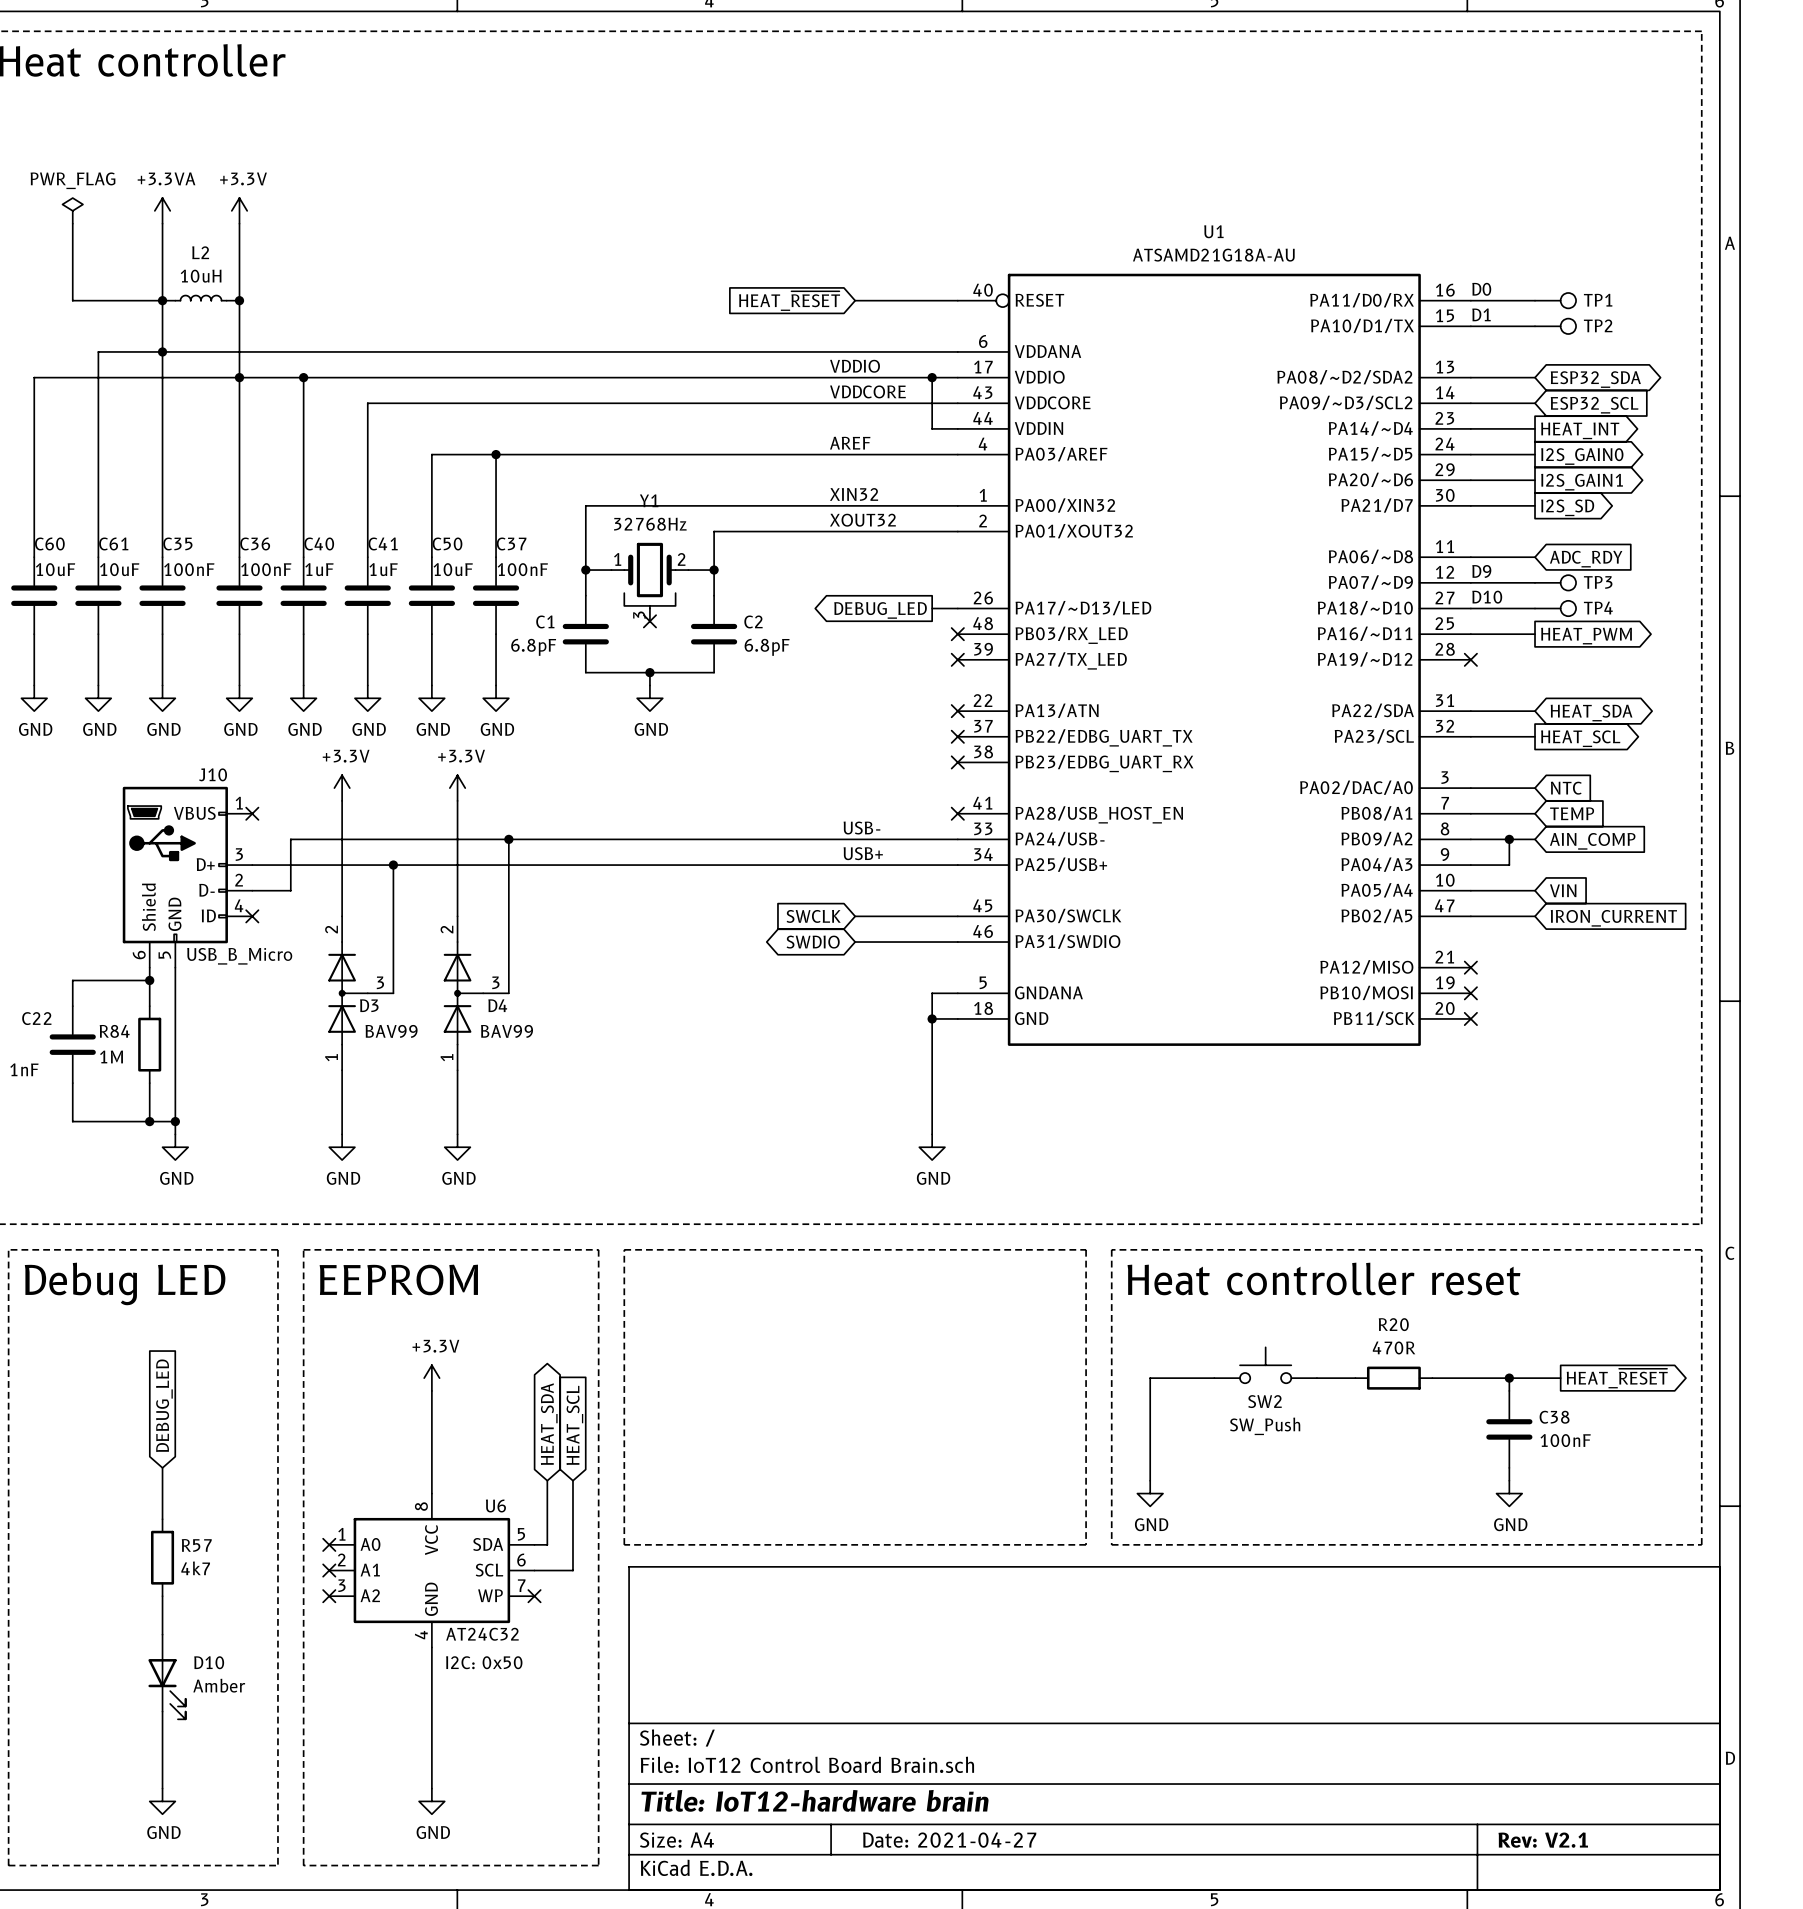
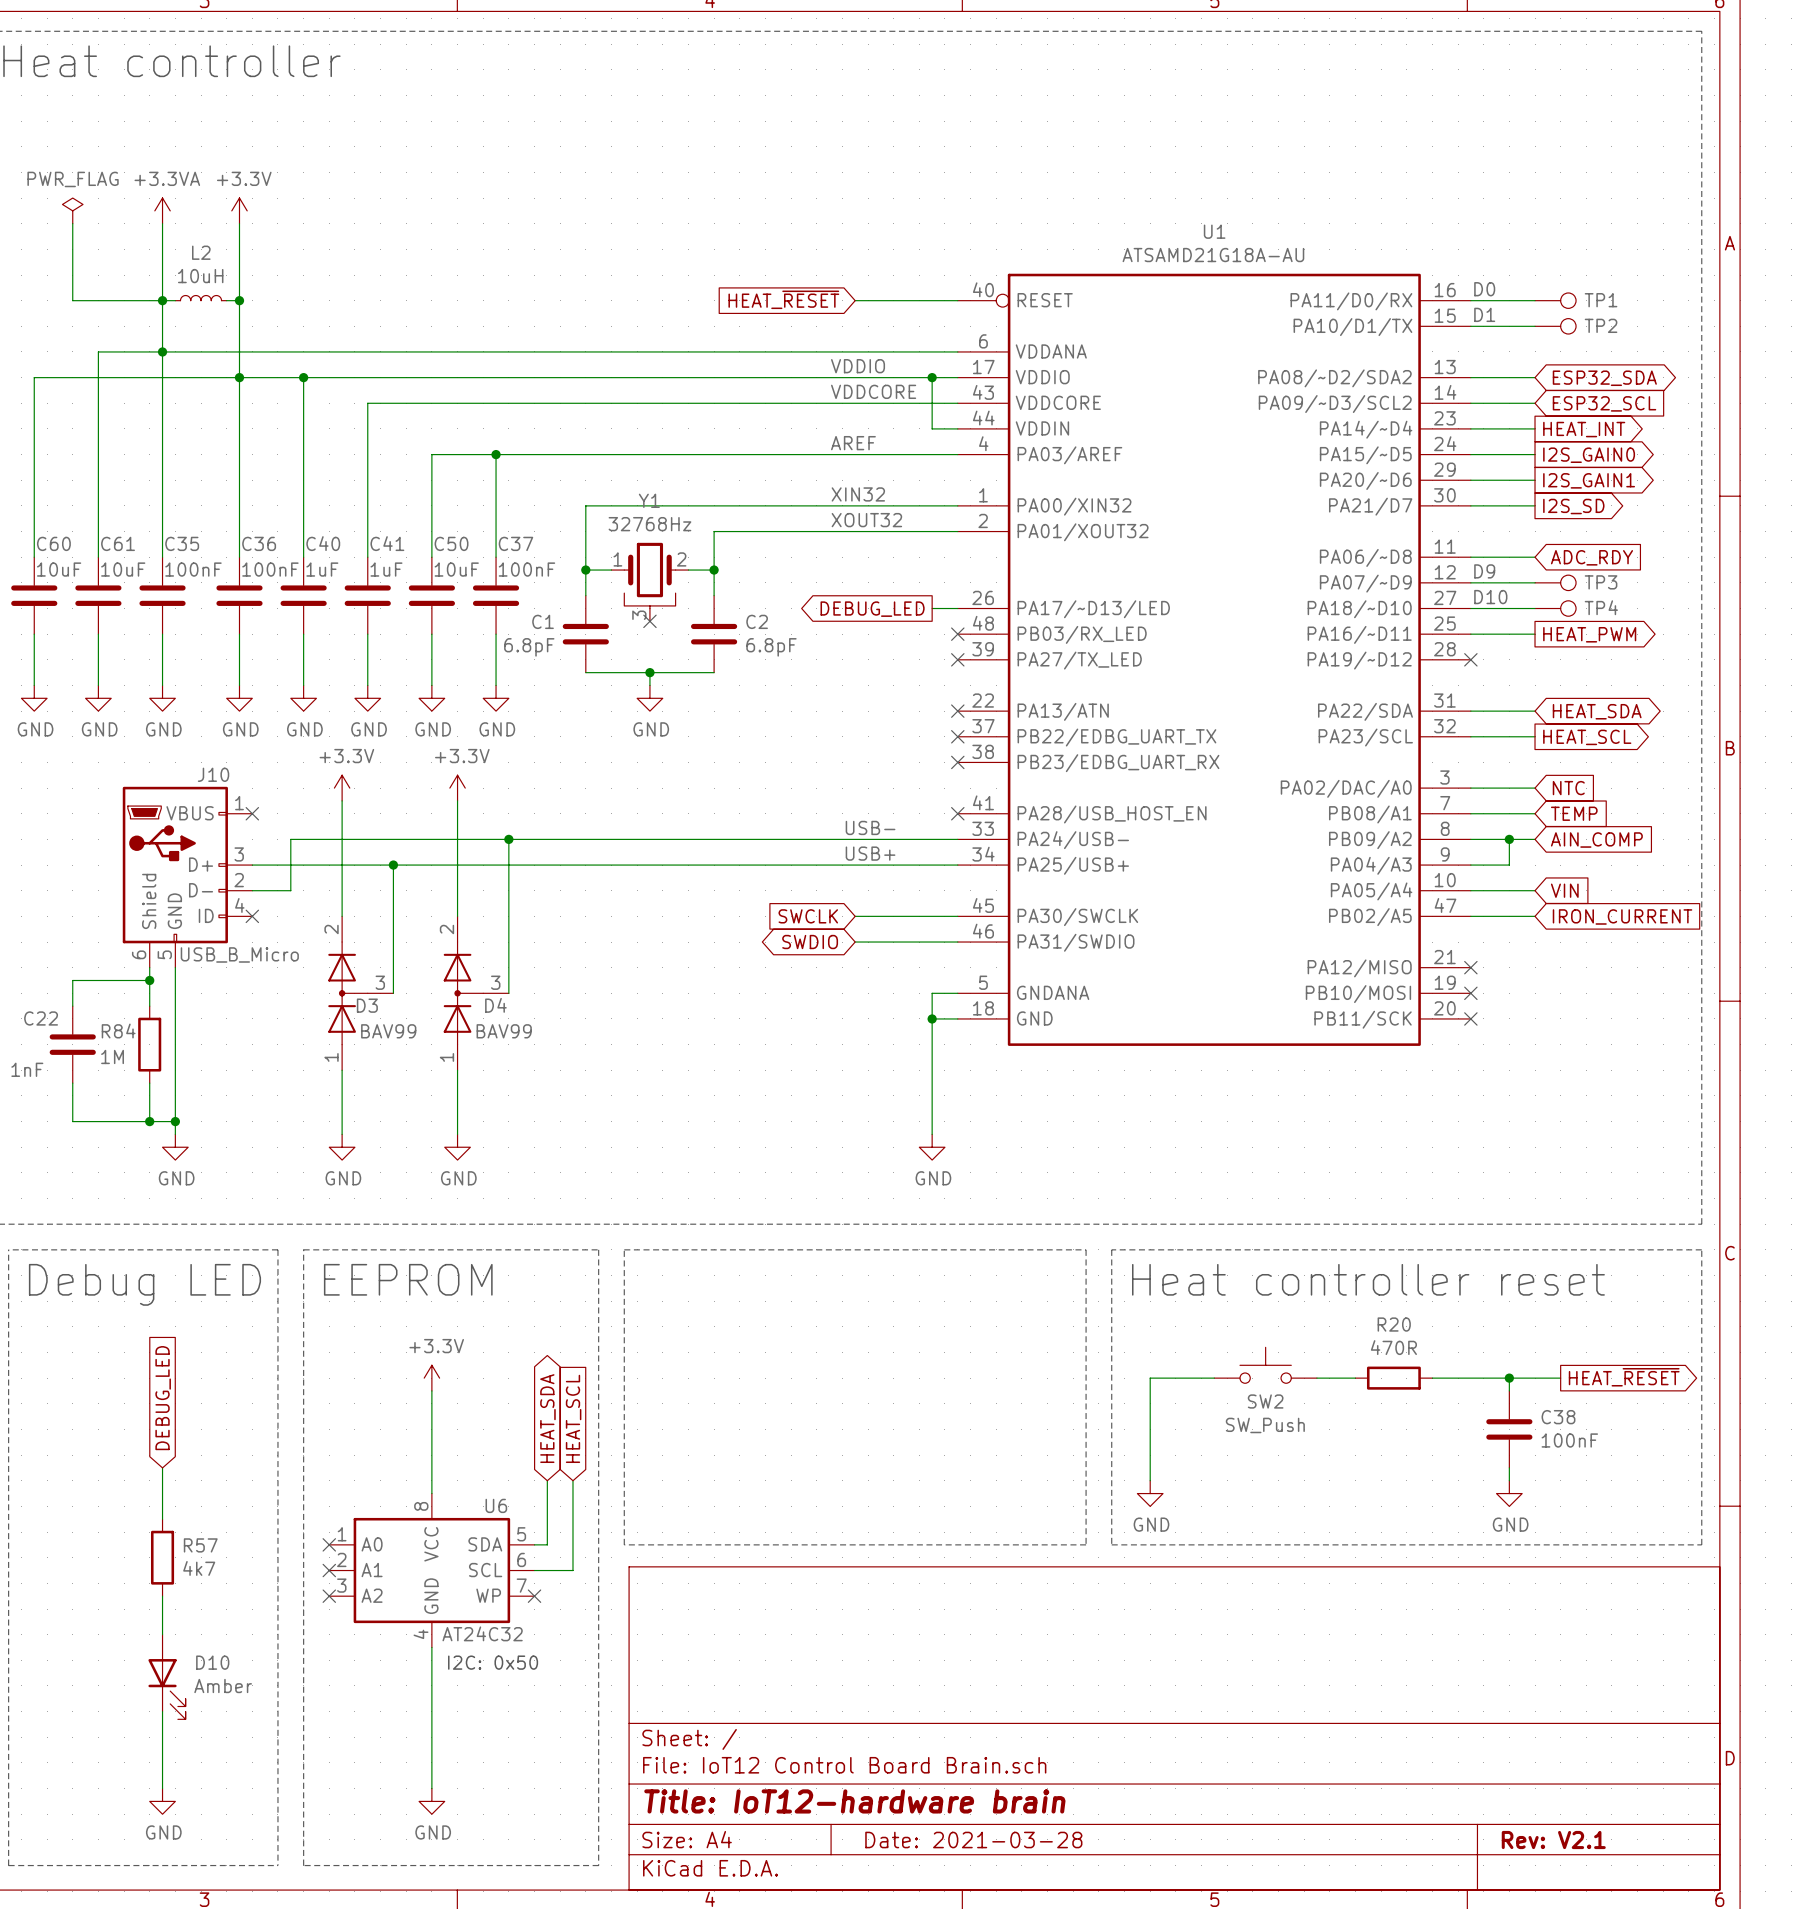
title block: Date: 2021-04-27 (949, 1840) -> Date: 2021-03-28 (973, 1840)

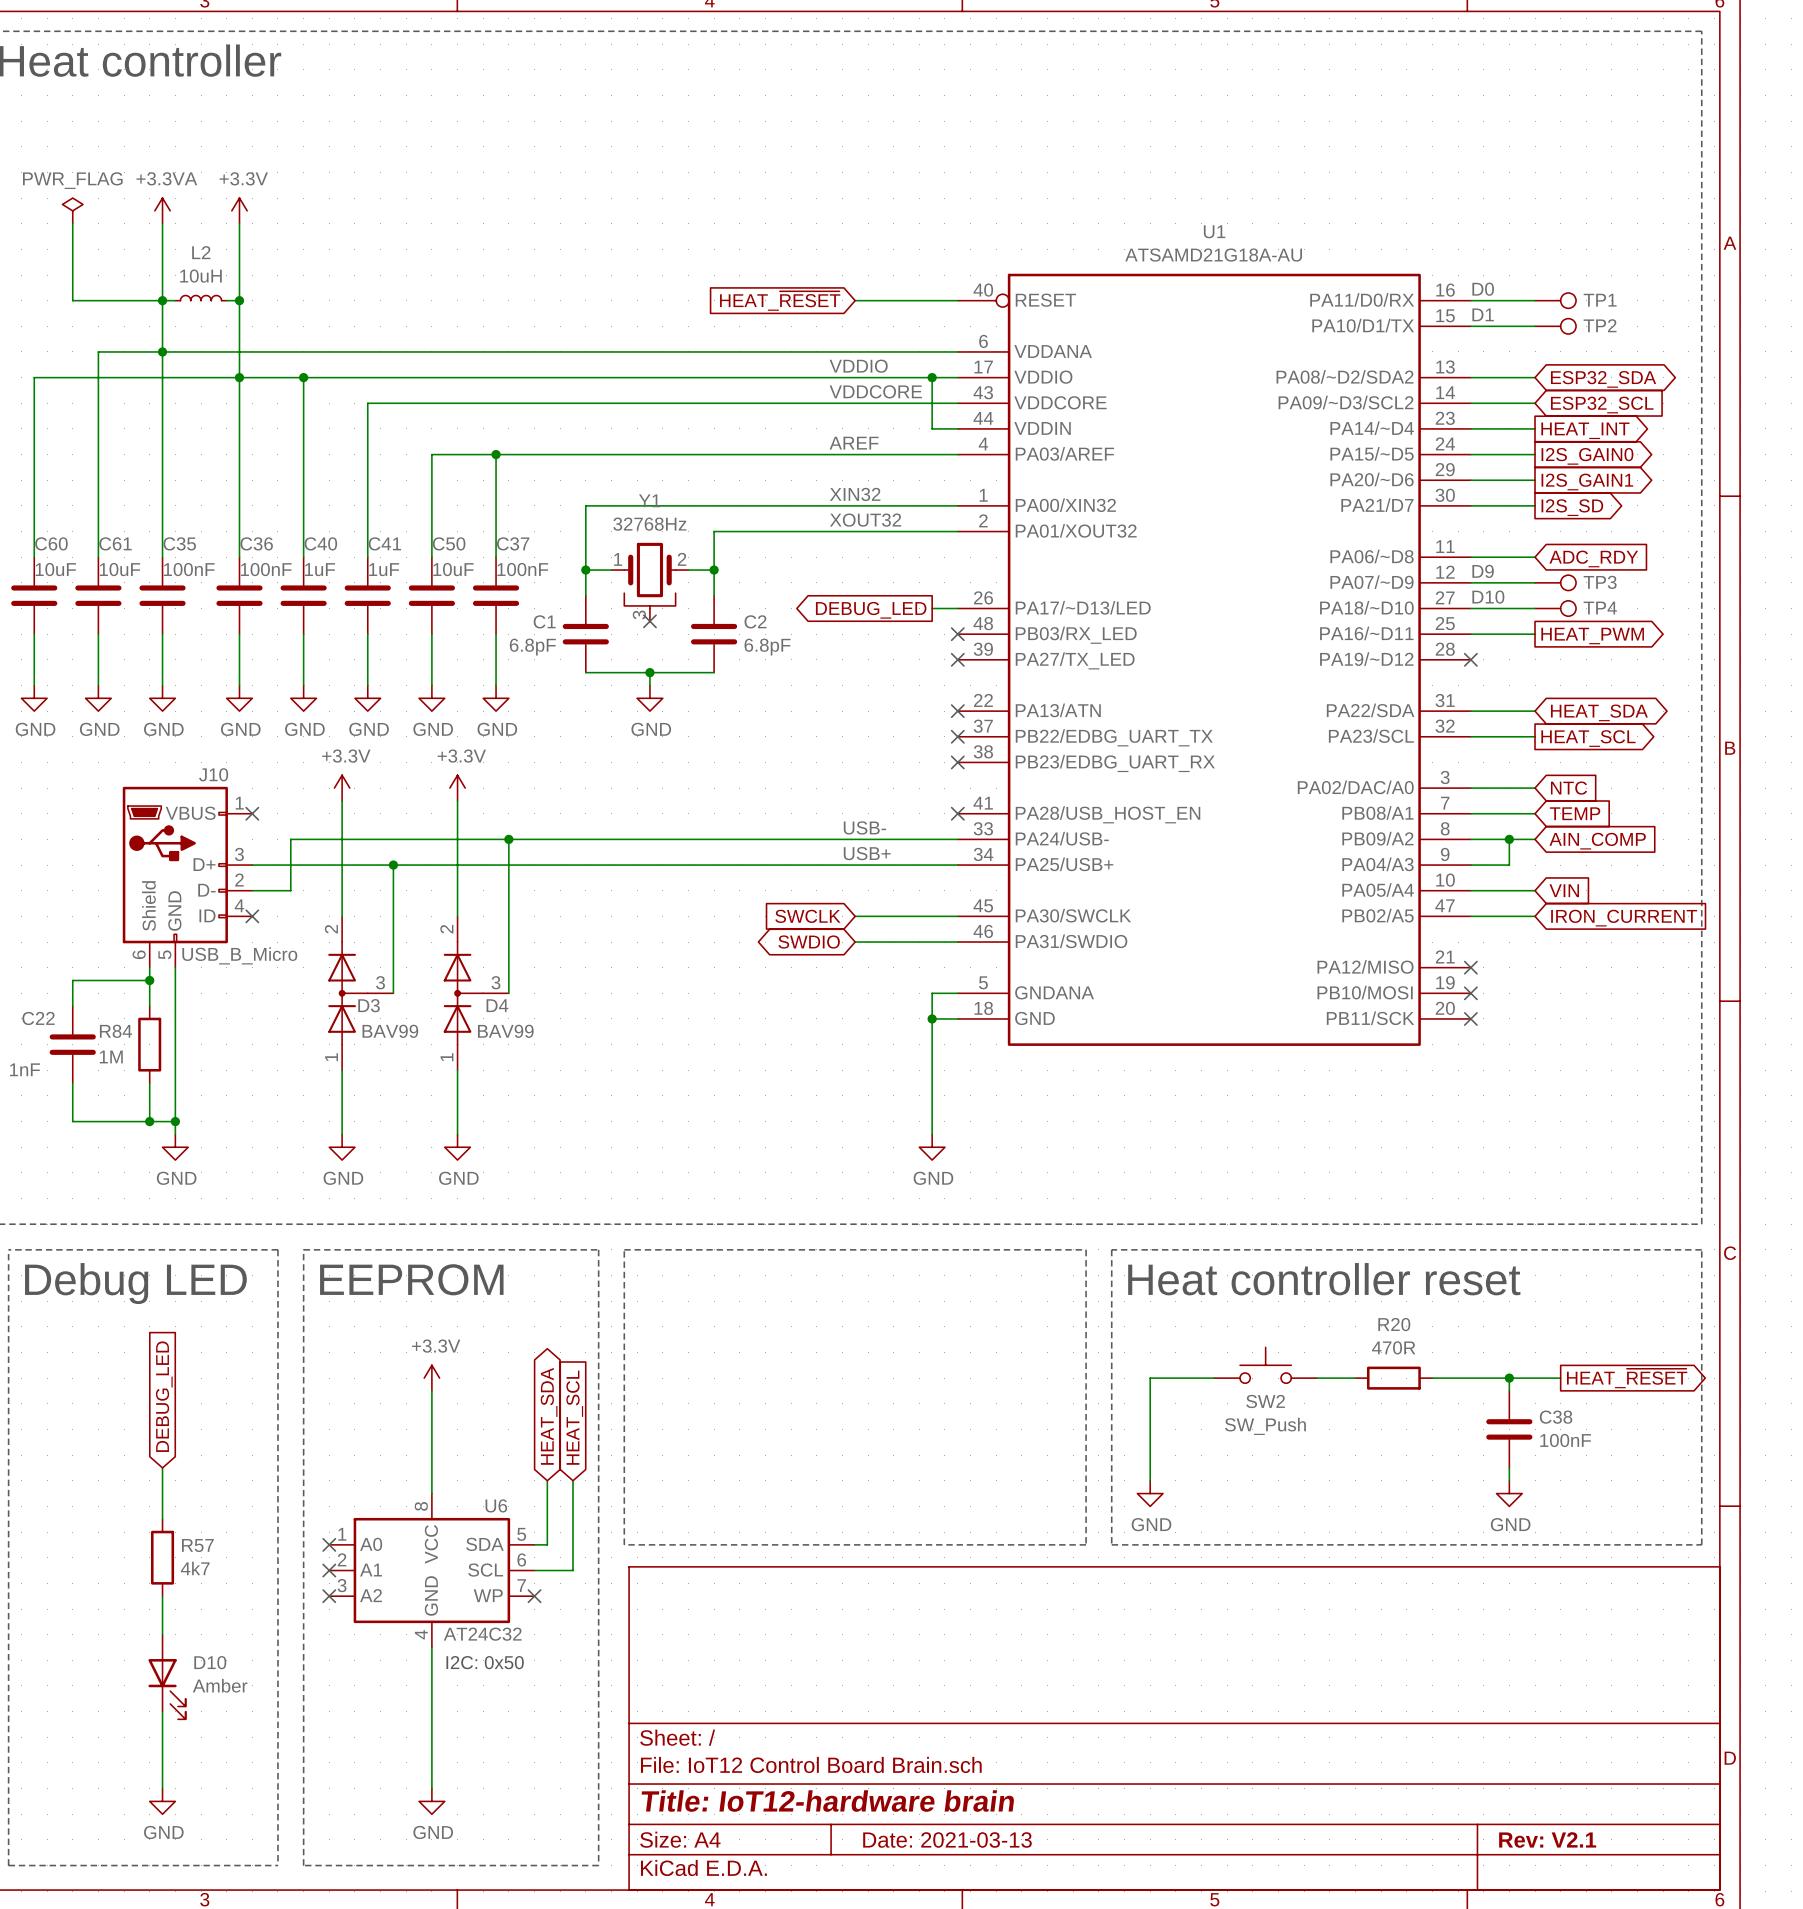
title block: Date: 2021-03-28 (973, 1840) -> Date: 2021-03-13 (947, 1840)

